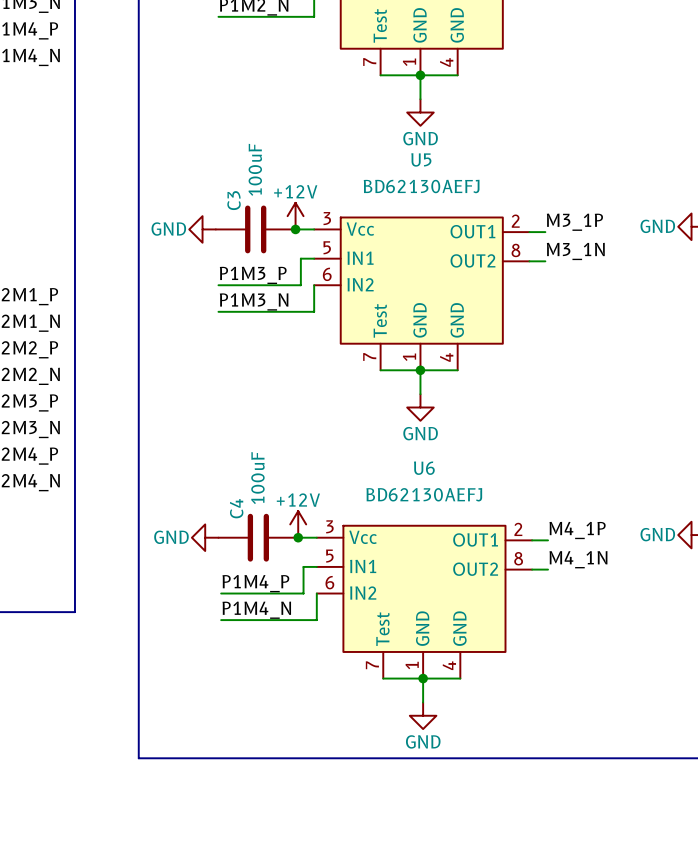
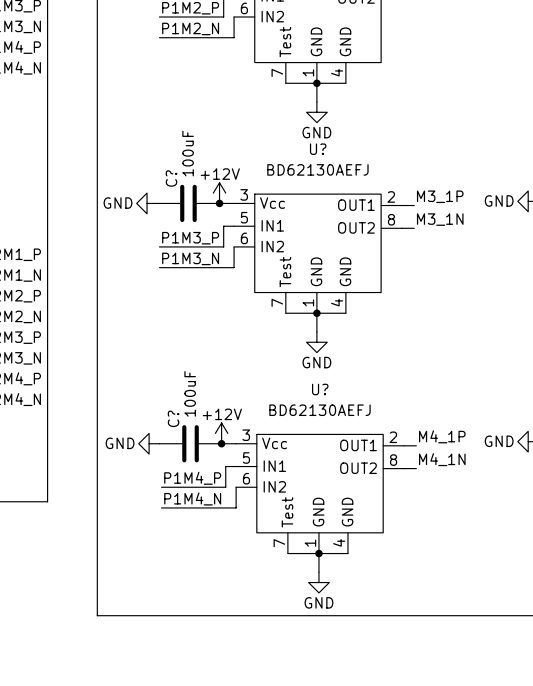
U5 name: U5 (421, 159) -> U? (318, 149)
C3 name: C3 (234, 200) -> C? (171, 178)
U6 name: U6 (424, 468) -> U? (320, 389)
C4 name: C4 (236, 508) -> C? (173, 418)

